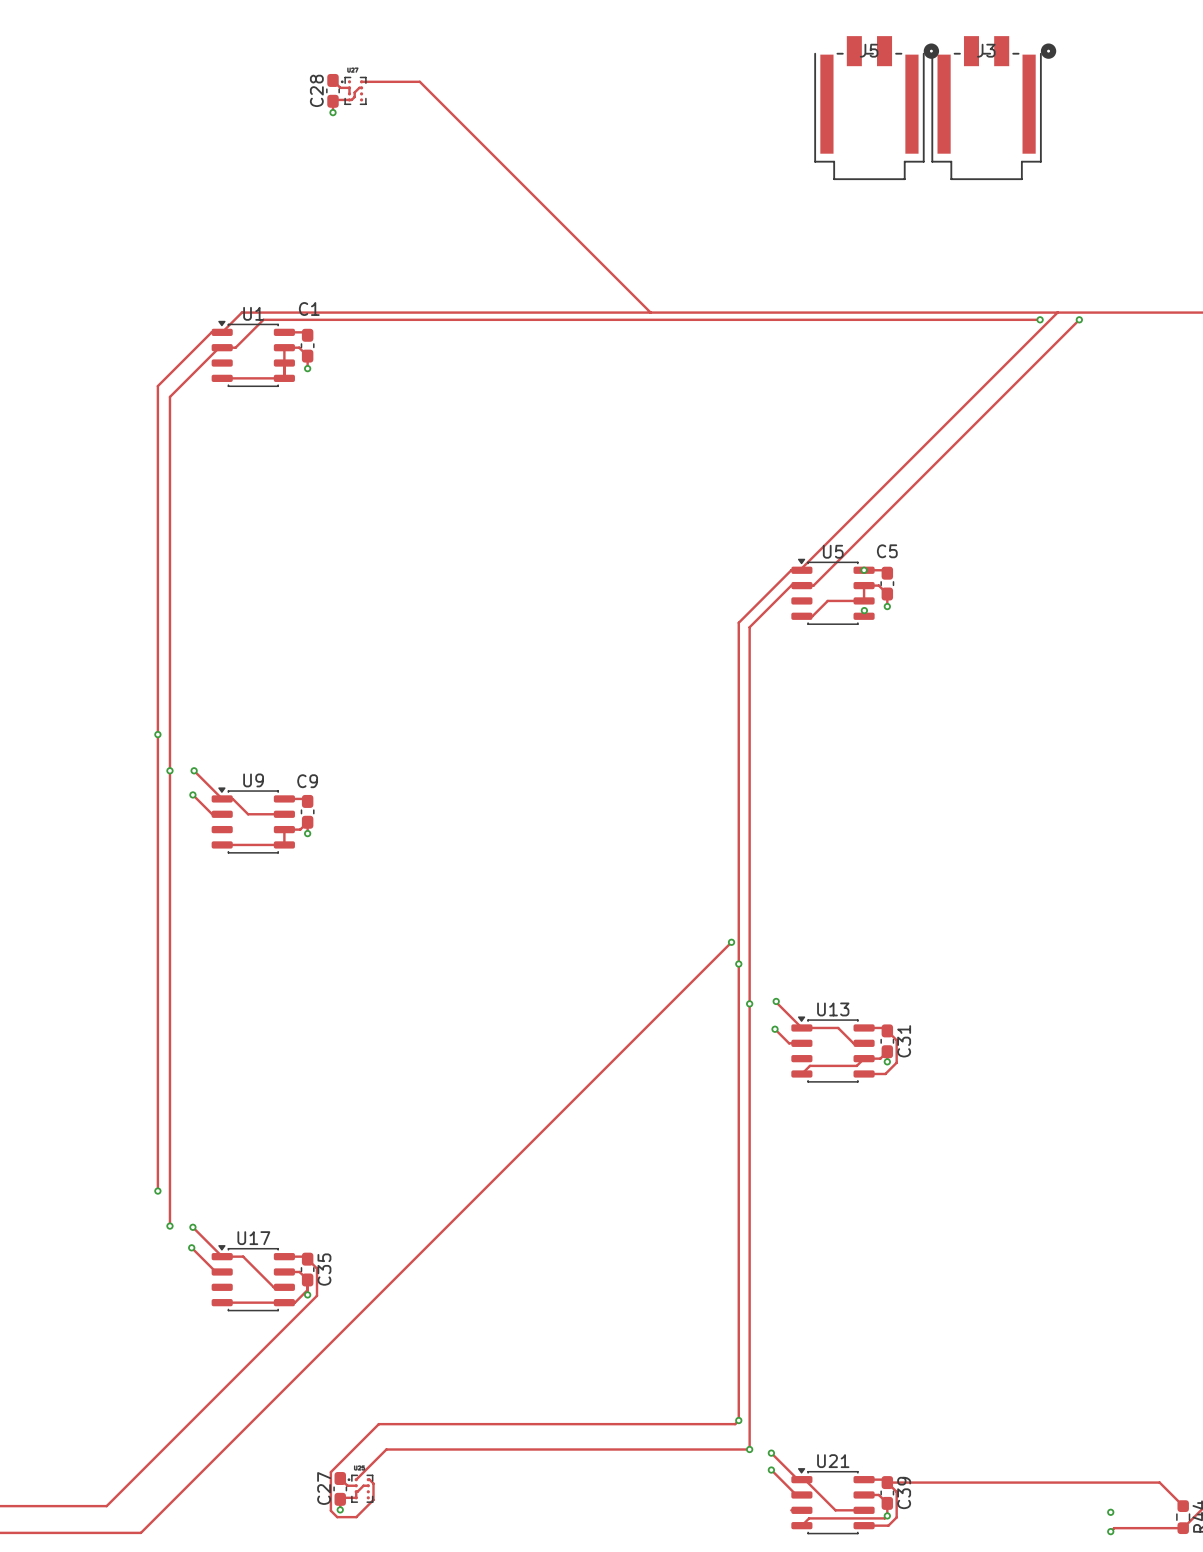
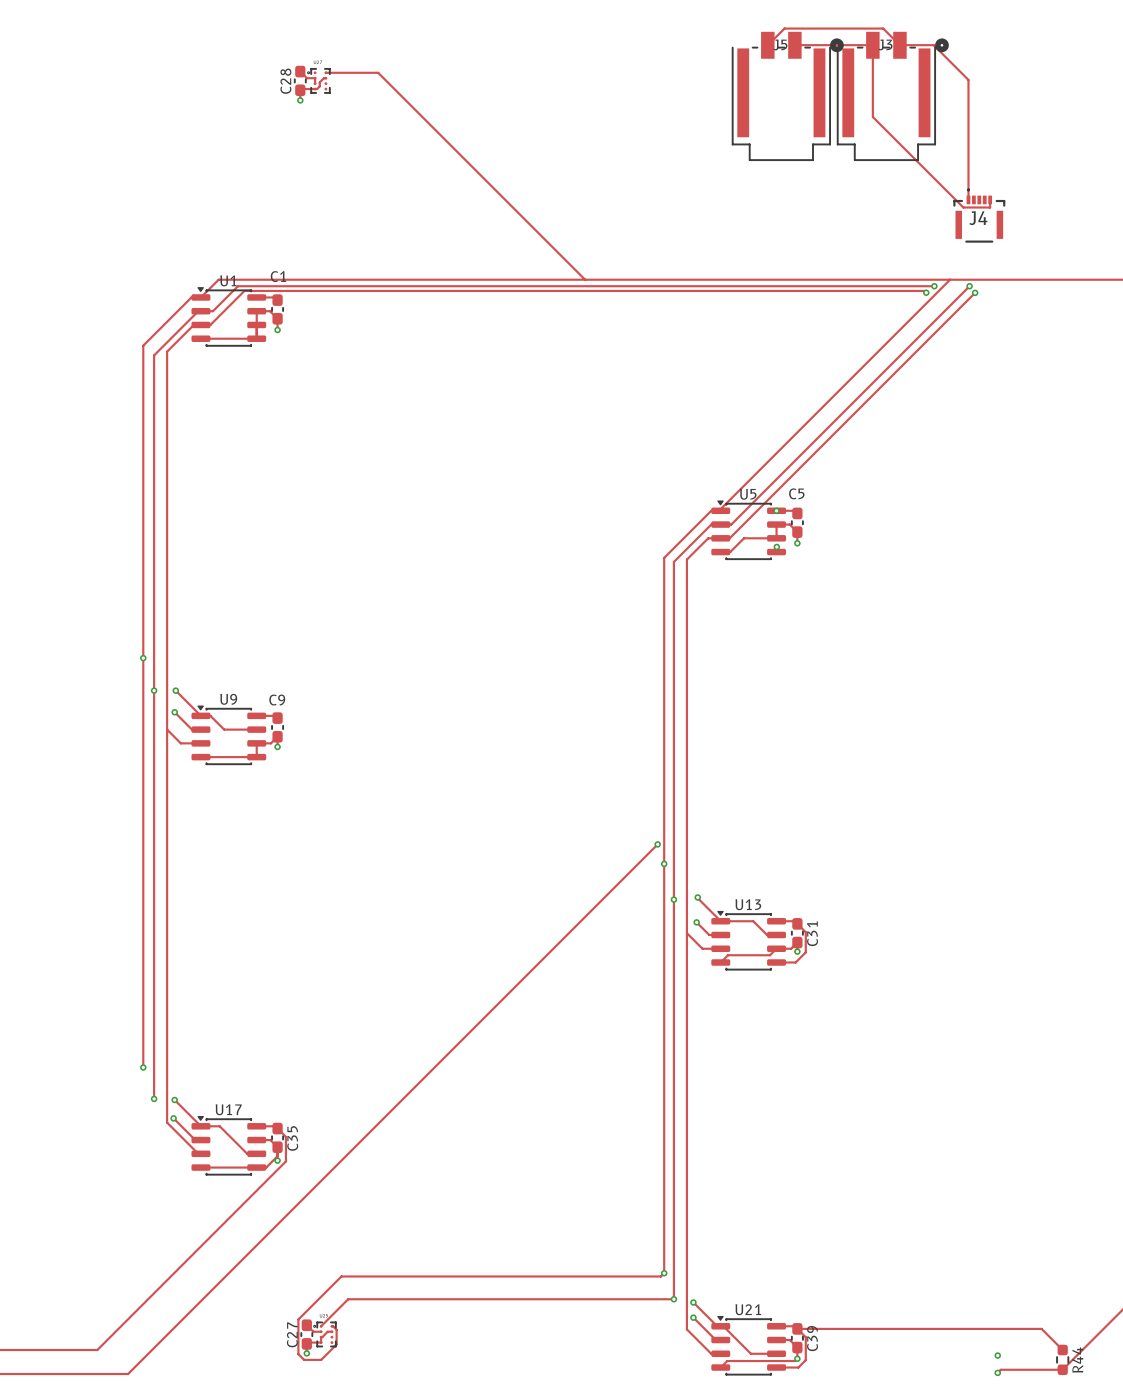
track: none -> (767, 45) (784, 28) (883, 28) (899, 45)
track: none -> (795, 45) (872, 45)
track: none -> (872, 45) (872, 117) (963, 207) (989, 207) (990, 199)
track: none -> (900, 45) (933, 45) (968, 79) (968, 199)
J4: none -> (979, 215)
track: none -> (926, 292) (924, 290) (244, 290) (210, 324) (200, 324)
via: none -> (926, 292)
track: none -> (975, 292) (729, 538) (708, 538) (686, 559) (686, 1329) (711, 1353)
via: none -> (975, 292)
track: none -> (193, 324) (167, 351) (167, 1122) (198, 1153)
track: none -> (167, 729) (180, 743) (200, 743)
track: none -> (686, 933) (702, 948) (720, 948)

